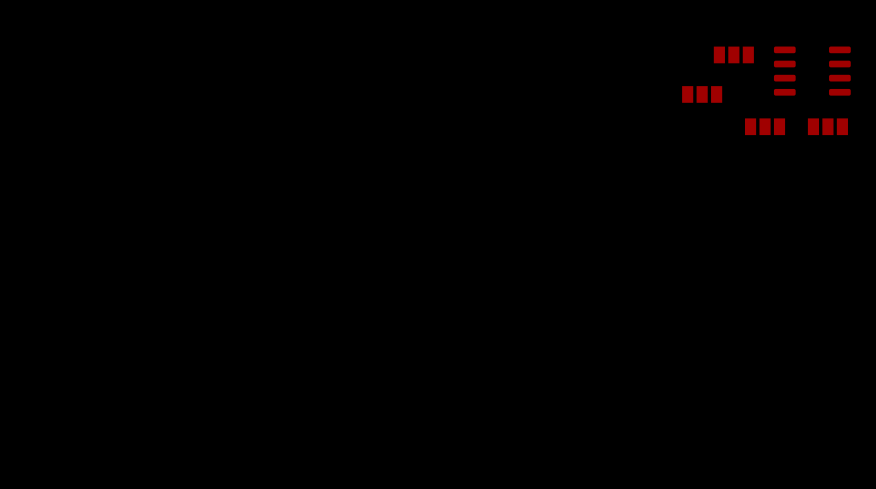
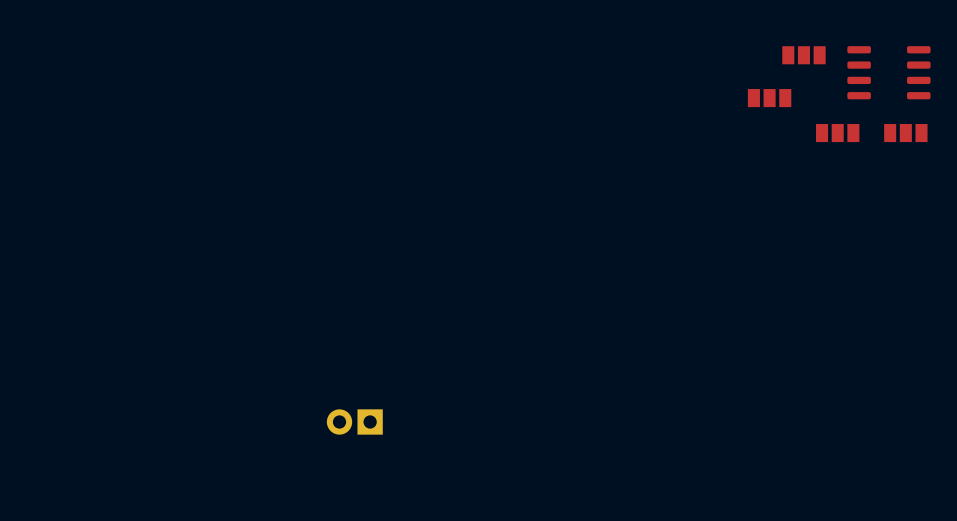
part: none -> (354, 421)

